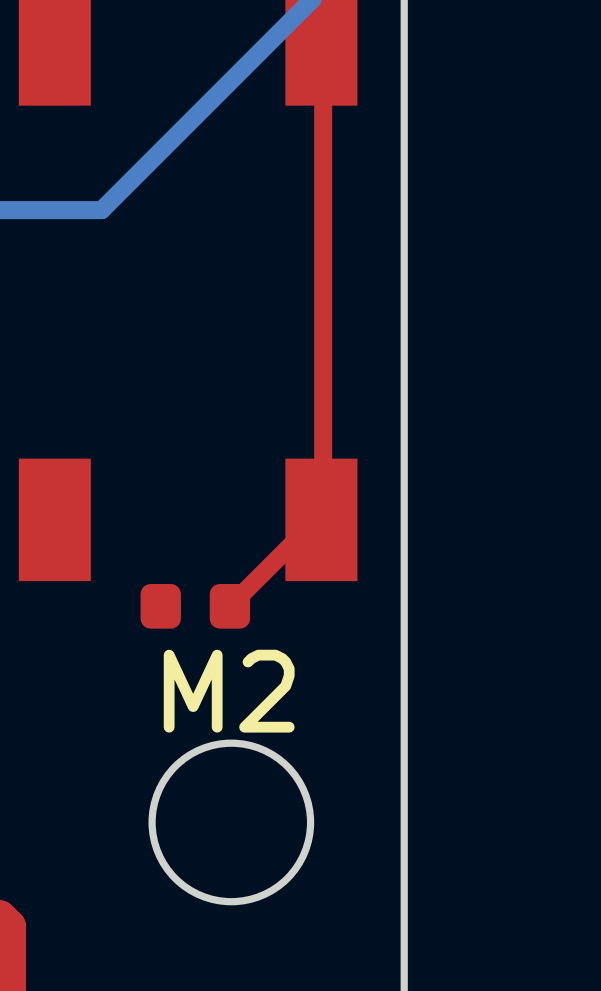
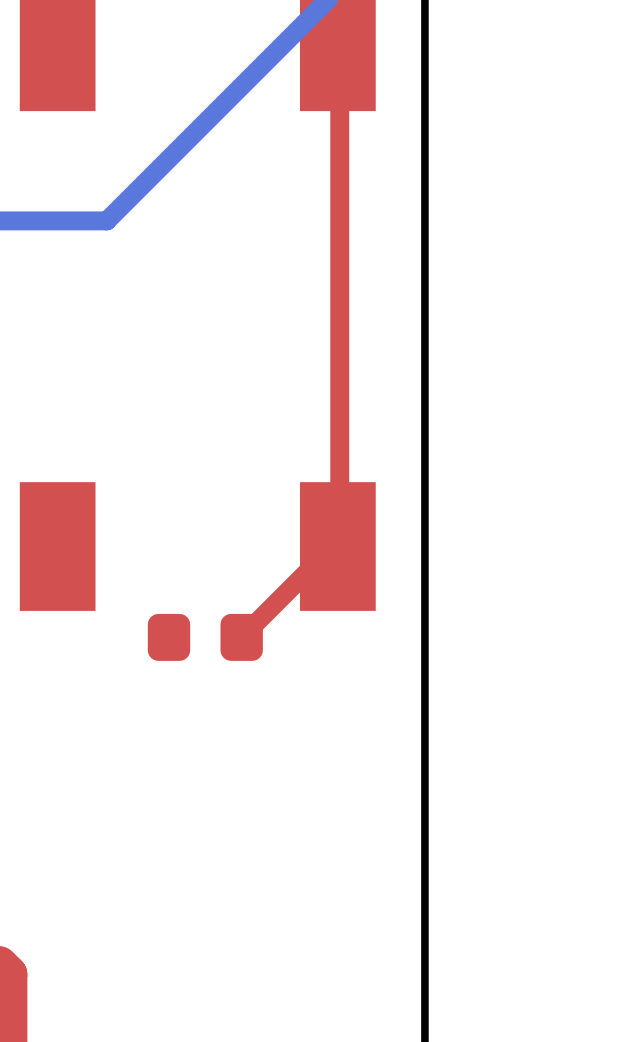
text: M2 (229, 691) -> none
round board edge: [148, 739, 315, 906] -> none

